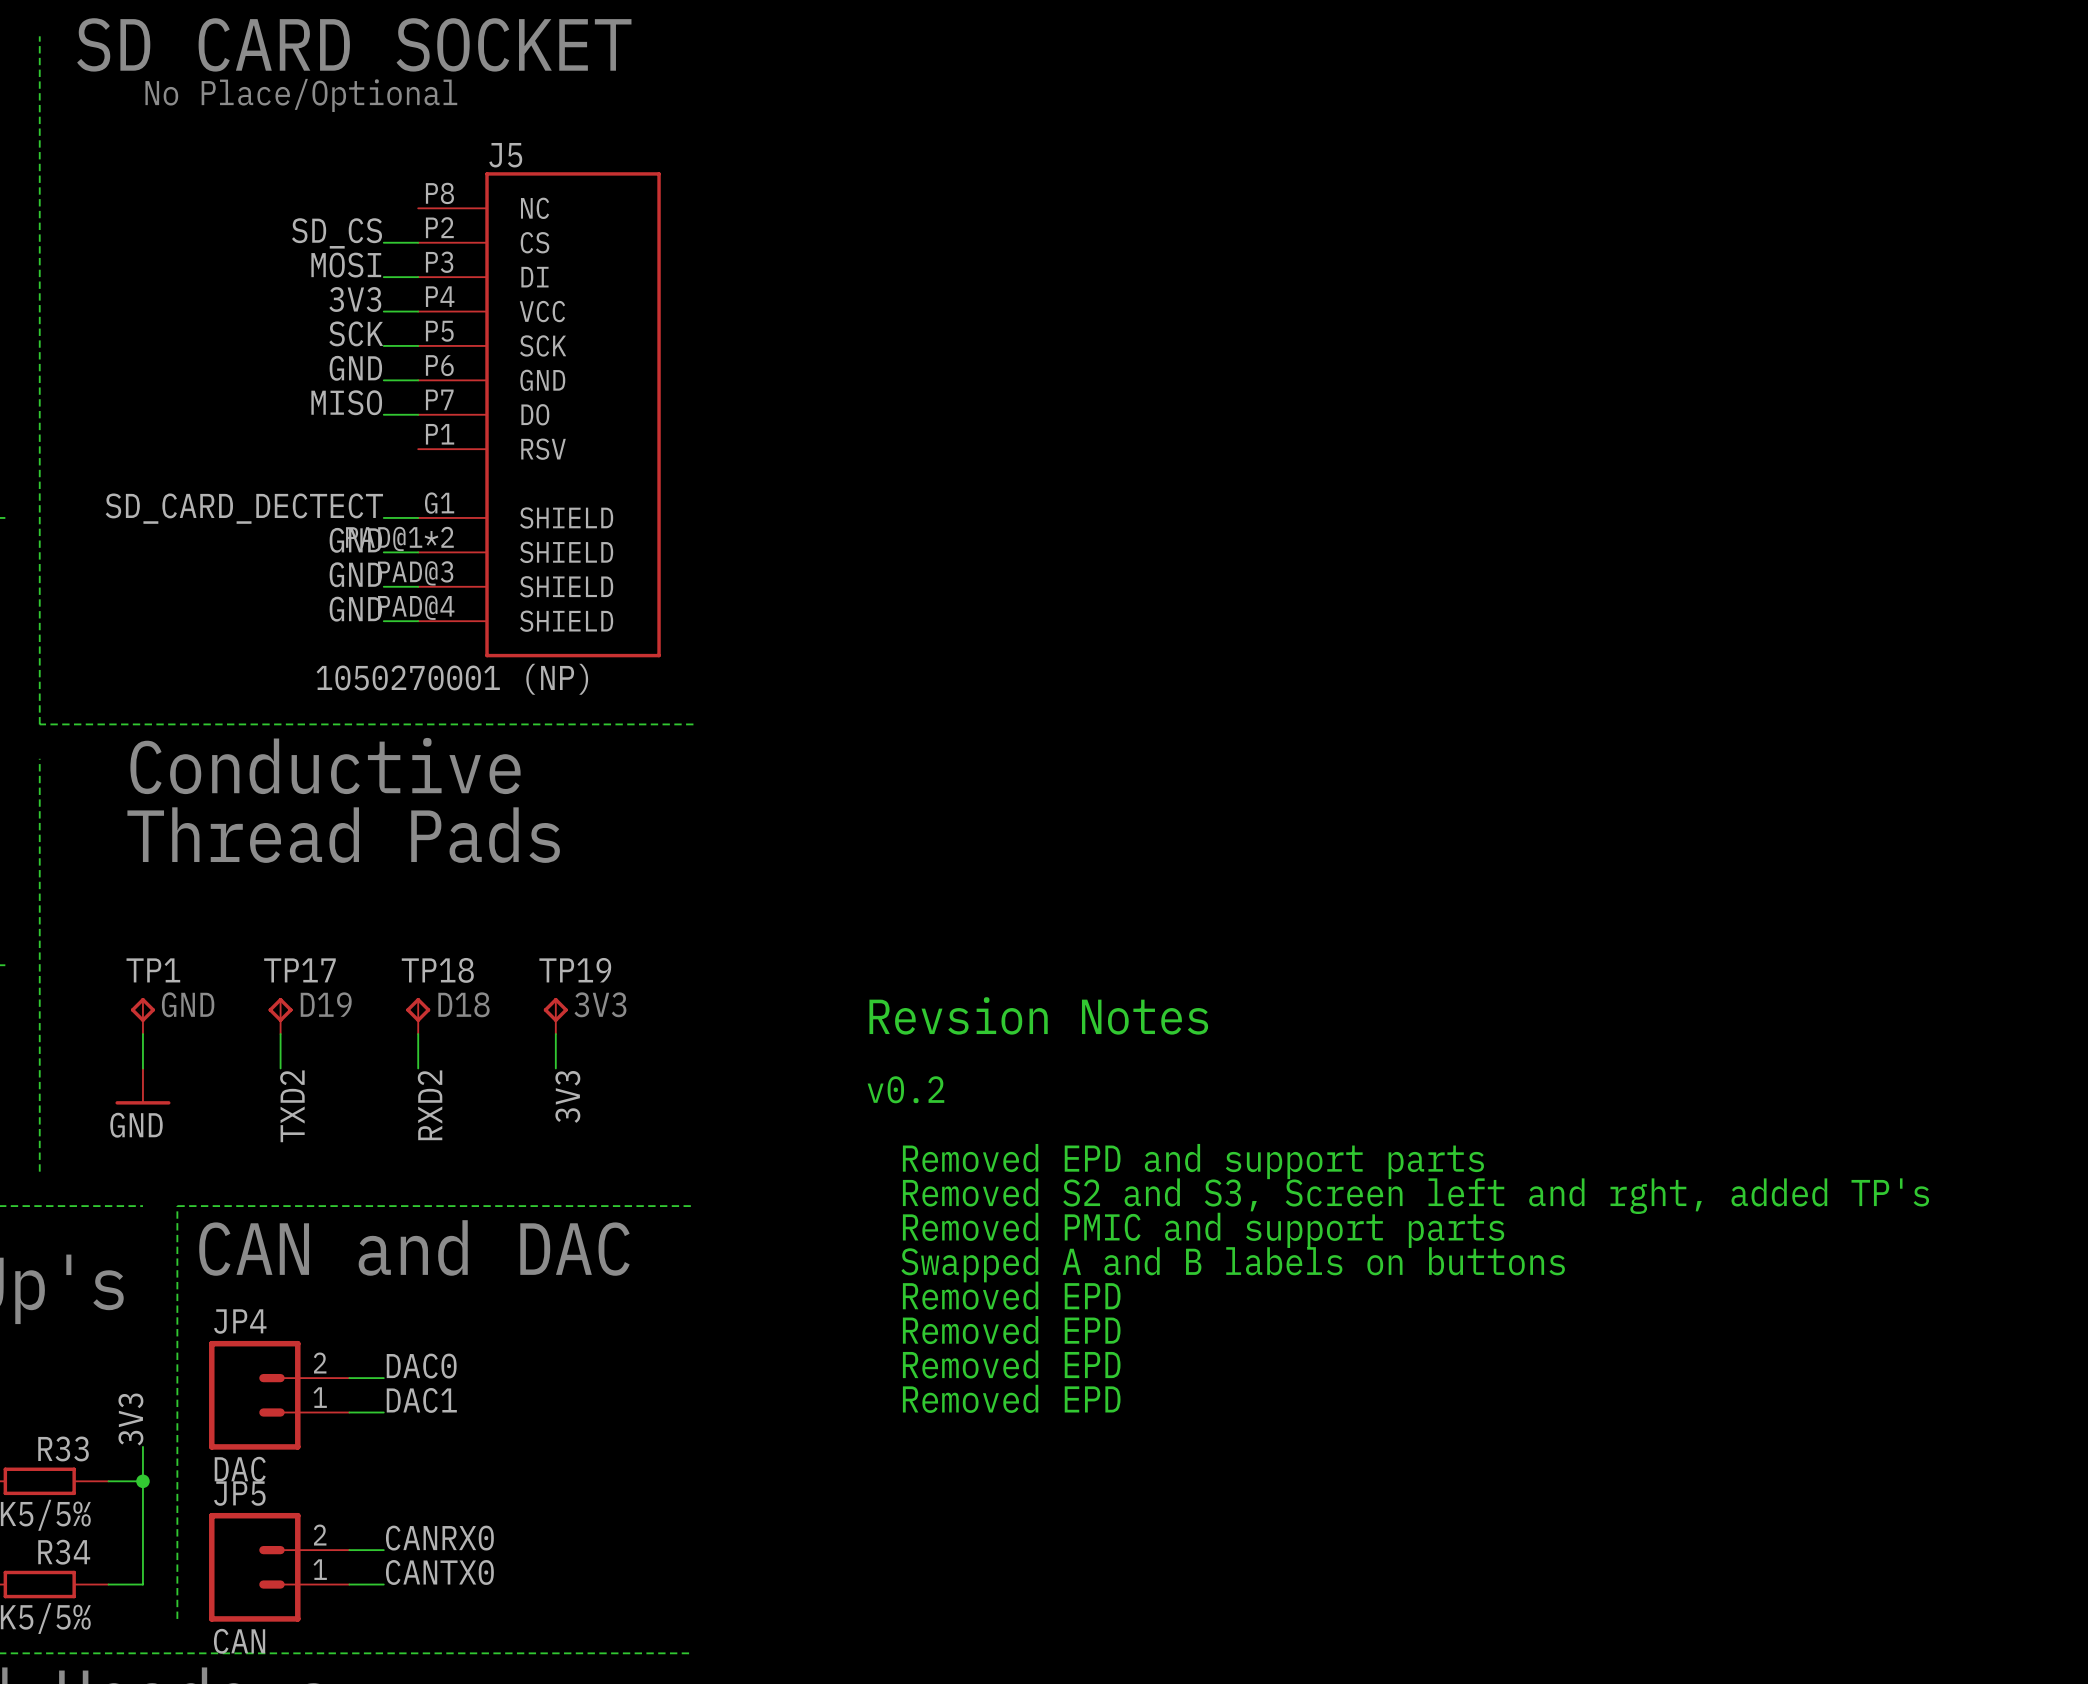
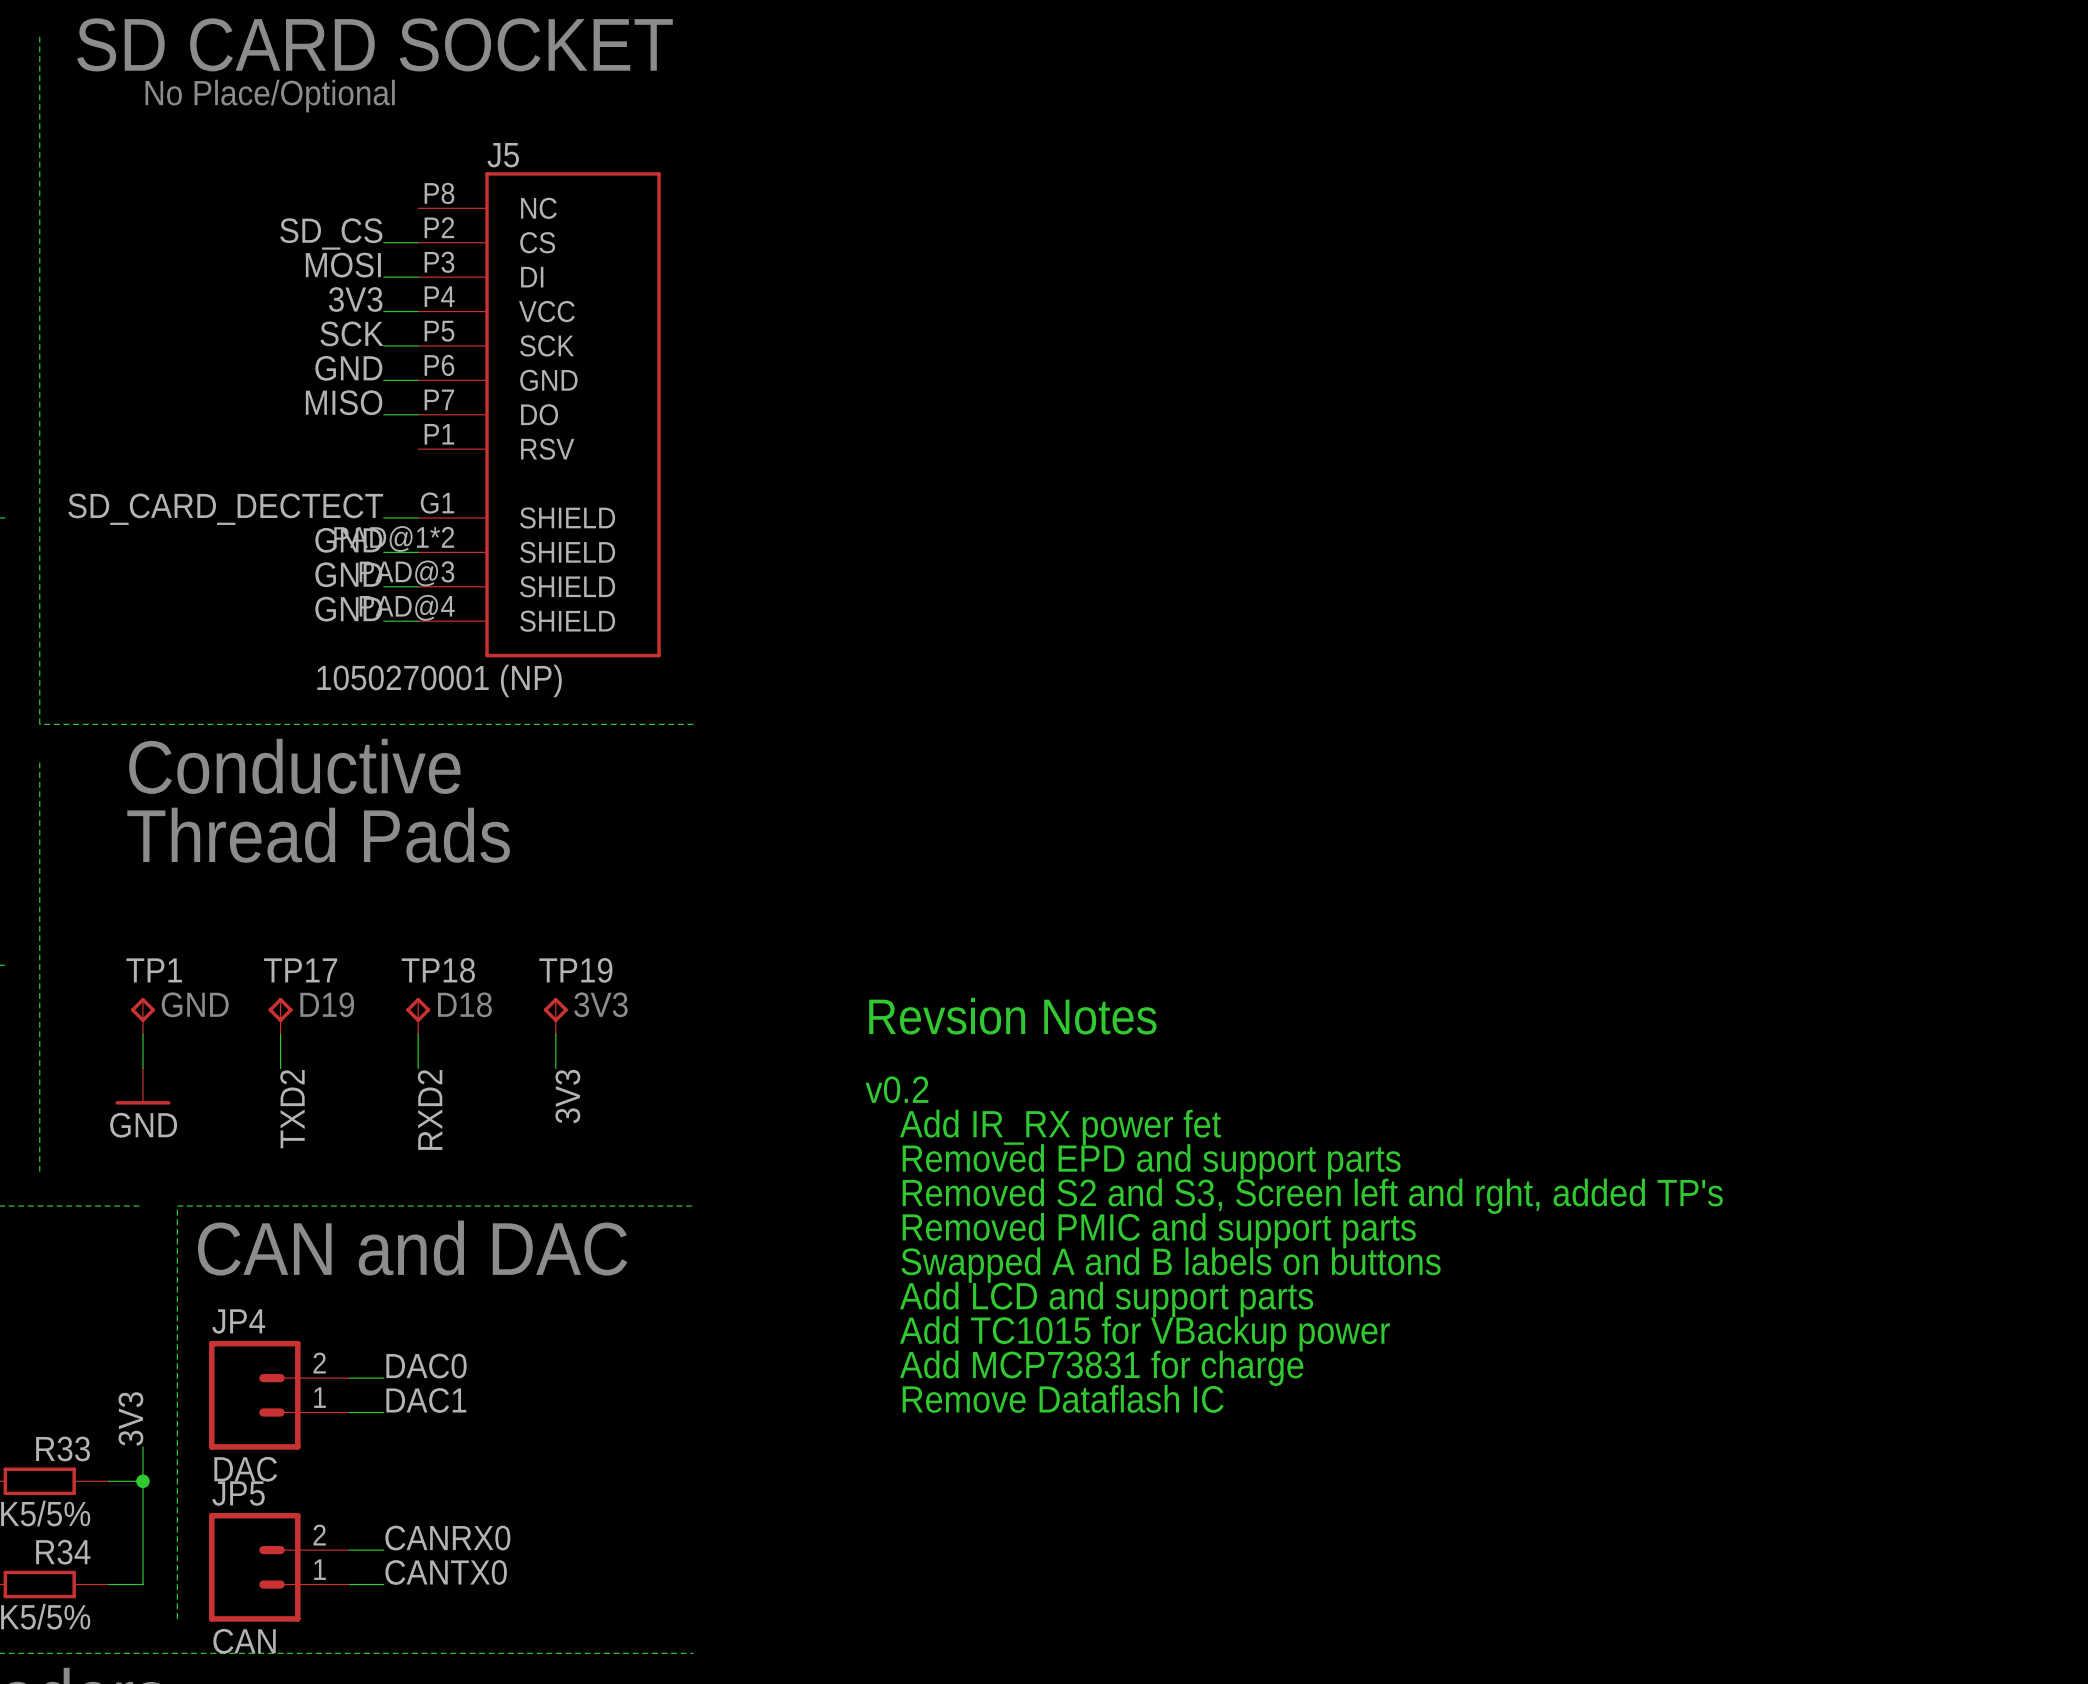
text: none -> Add IR_RX power fet (1060, 1127)
text: Removed EPD (1011, 1295) -> Add LCD and support parts (1106, 1299)
text: Removed EPD (1011, 1330) -> Add TC1015 for VBackup power (1144, 1333)
text: Removed EPD (1011, 1364) -> Add MCP73831 for charge (1101, 1368)
text: Removed EPD (1011, 1398) -> Remove Dataflash IC (1063, 1398)

